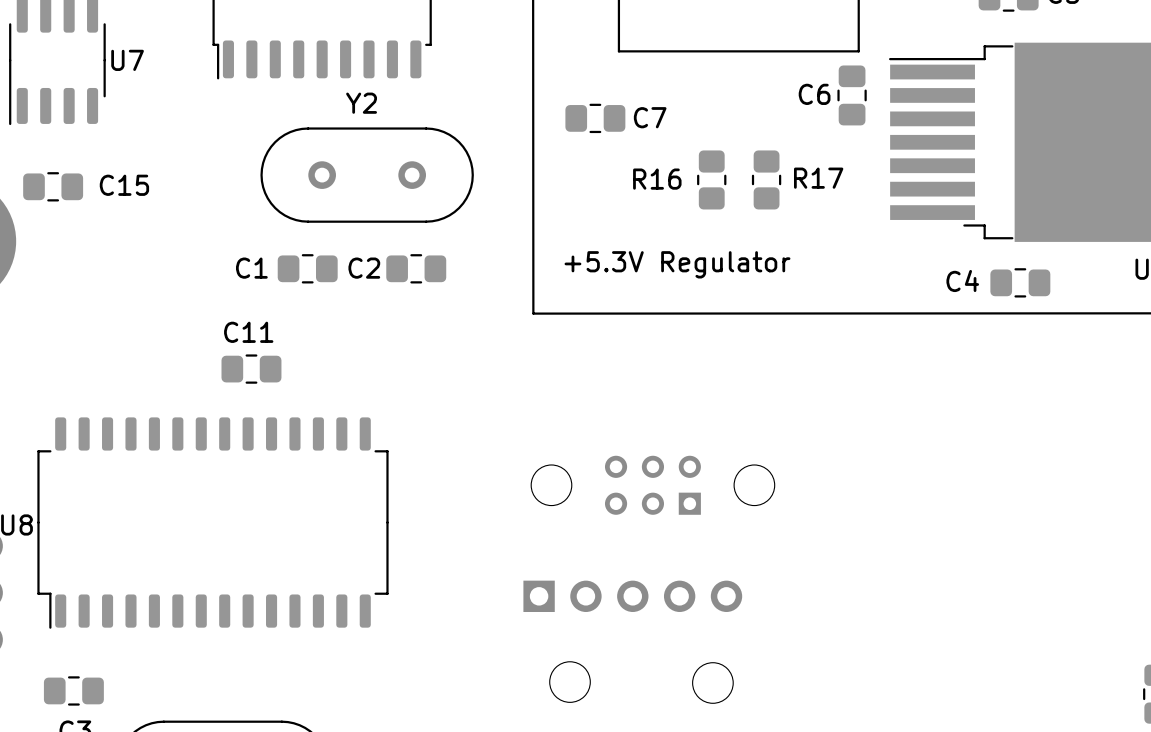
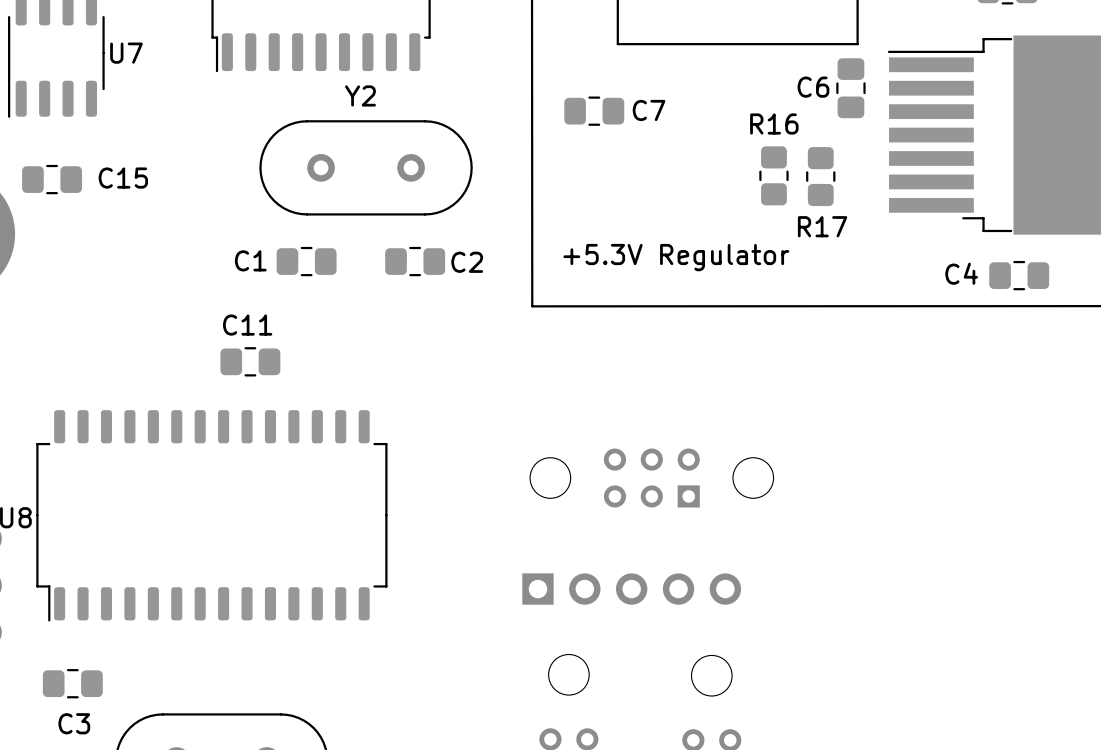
R17 name position: R17 (818, 178) -> R17 (822, 226)
R16 name position: R16 (657, 179) -> R16 (774, 124)
R16 position: (711, 179) -> (773, 175)
R17 position: (766, 179) -> (820, 176)
C2 name position: C2 (364, 268) -> C2 (467, 262)

